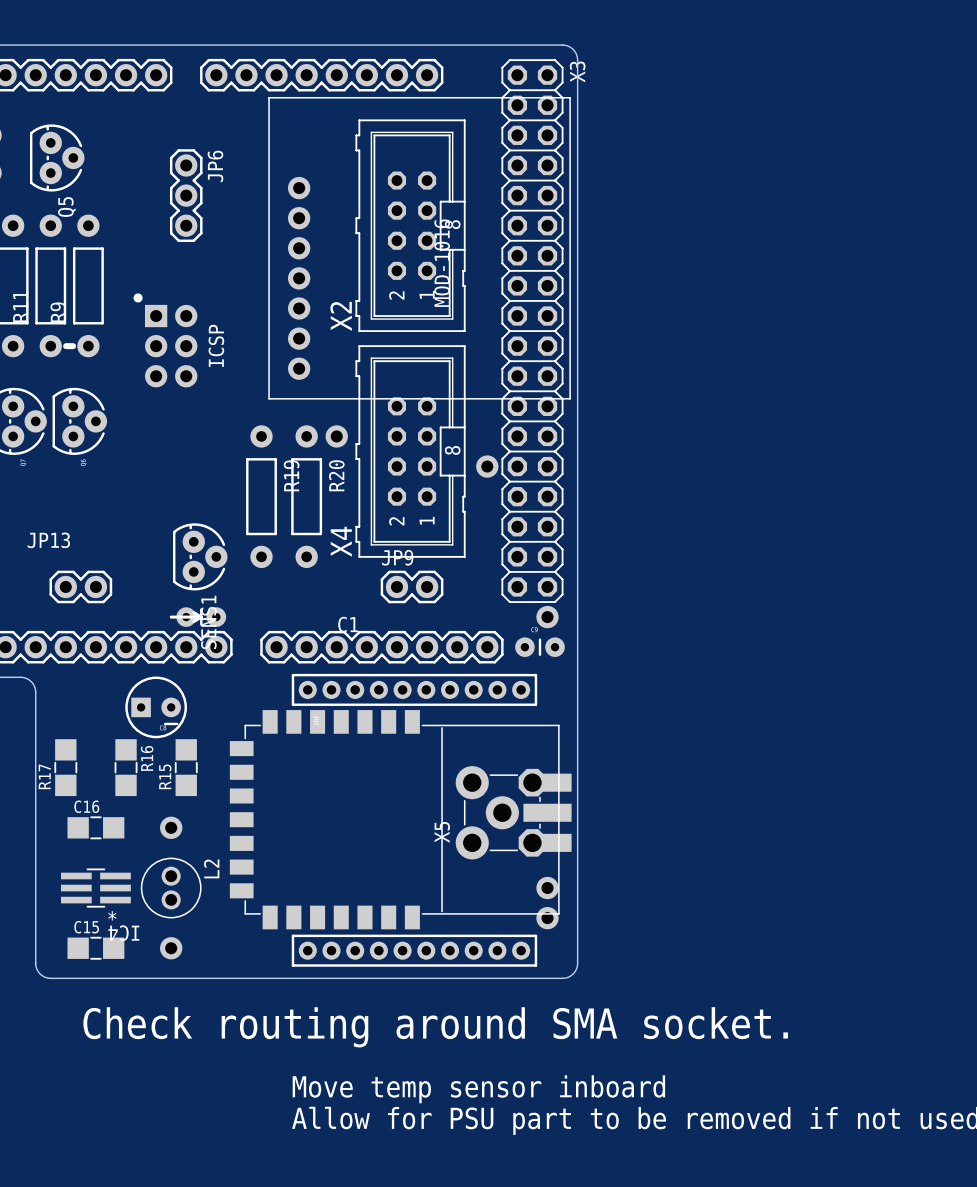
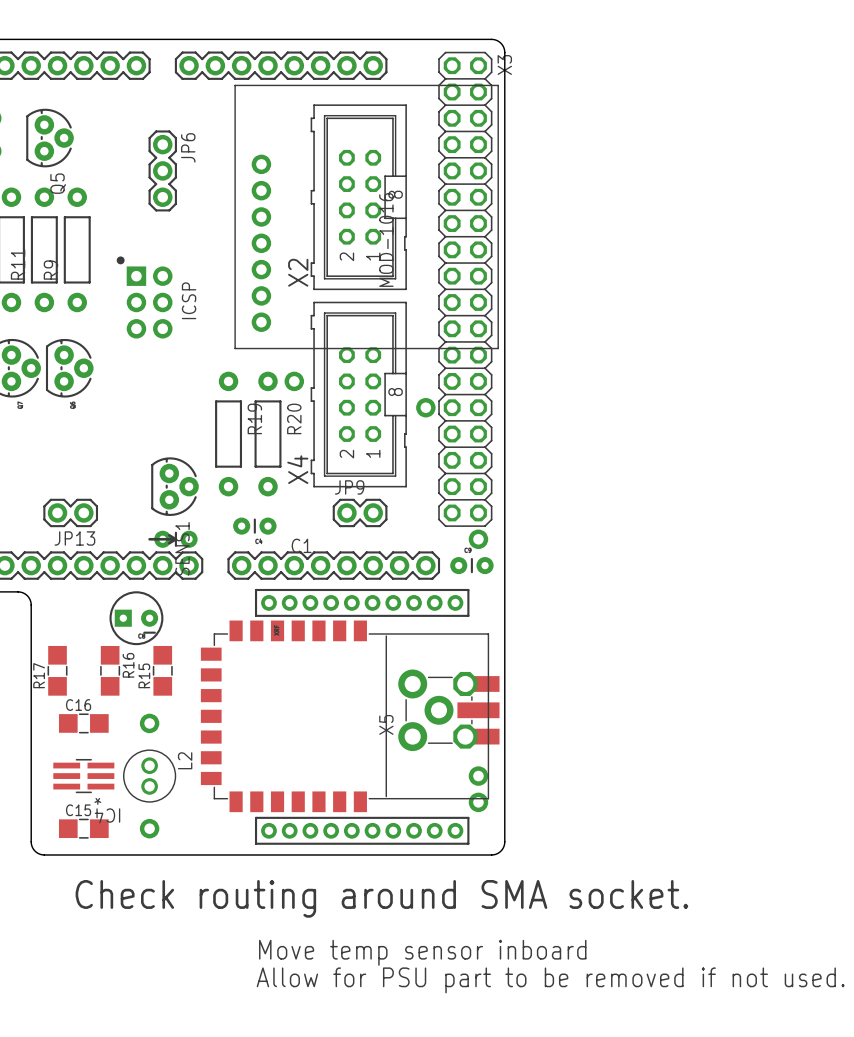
line: (66, 346) (73, 346) -> none
JP13 name position: JP13 (48, 540) -> JP13 (74, 538)
part: none -> (254, 526)

